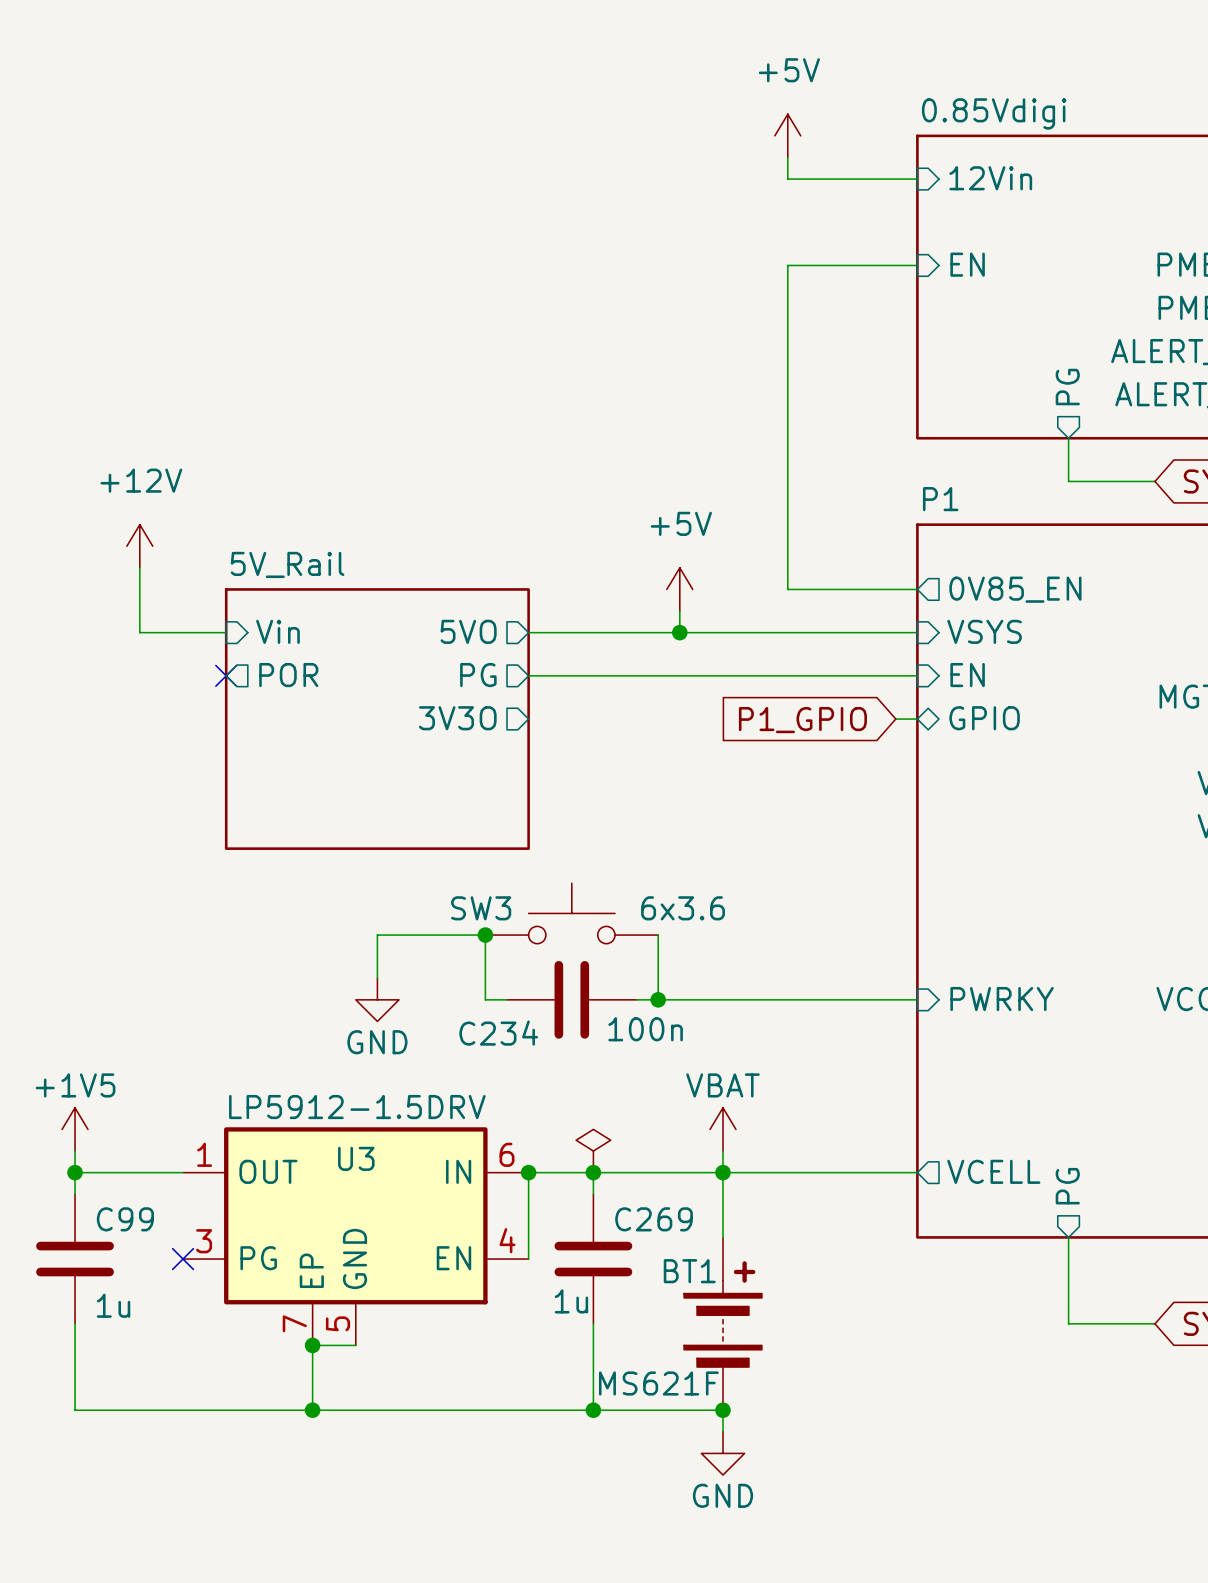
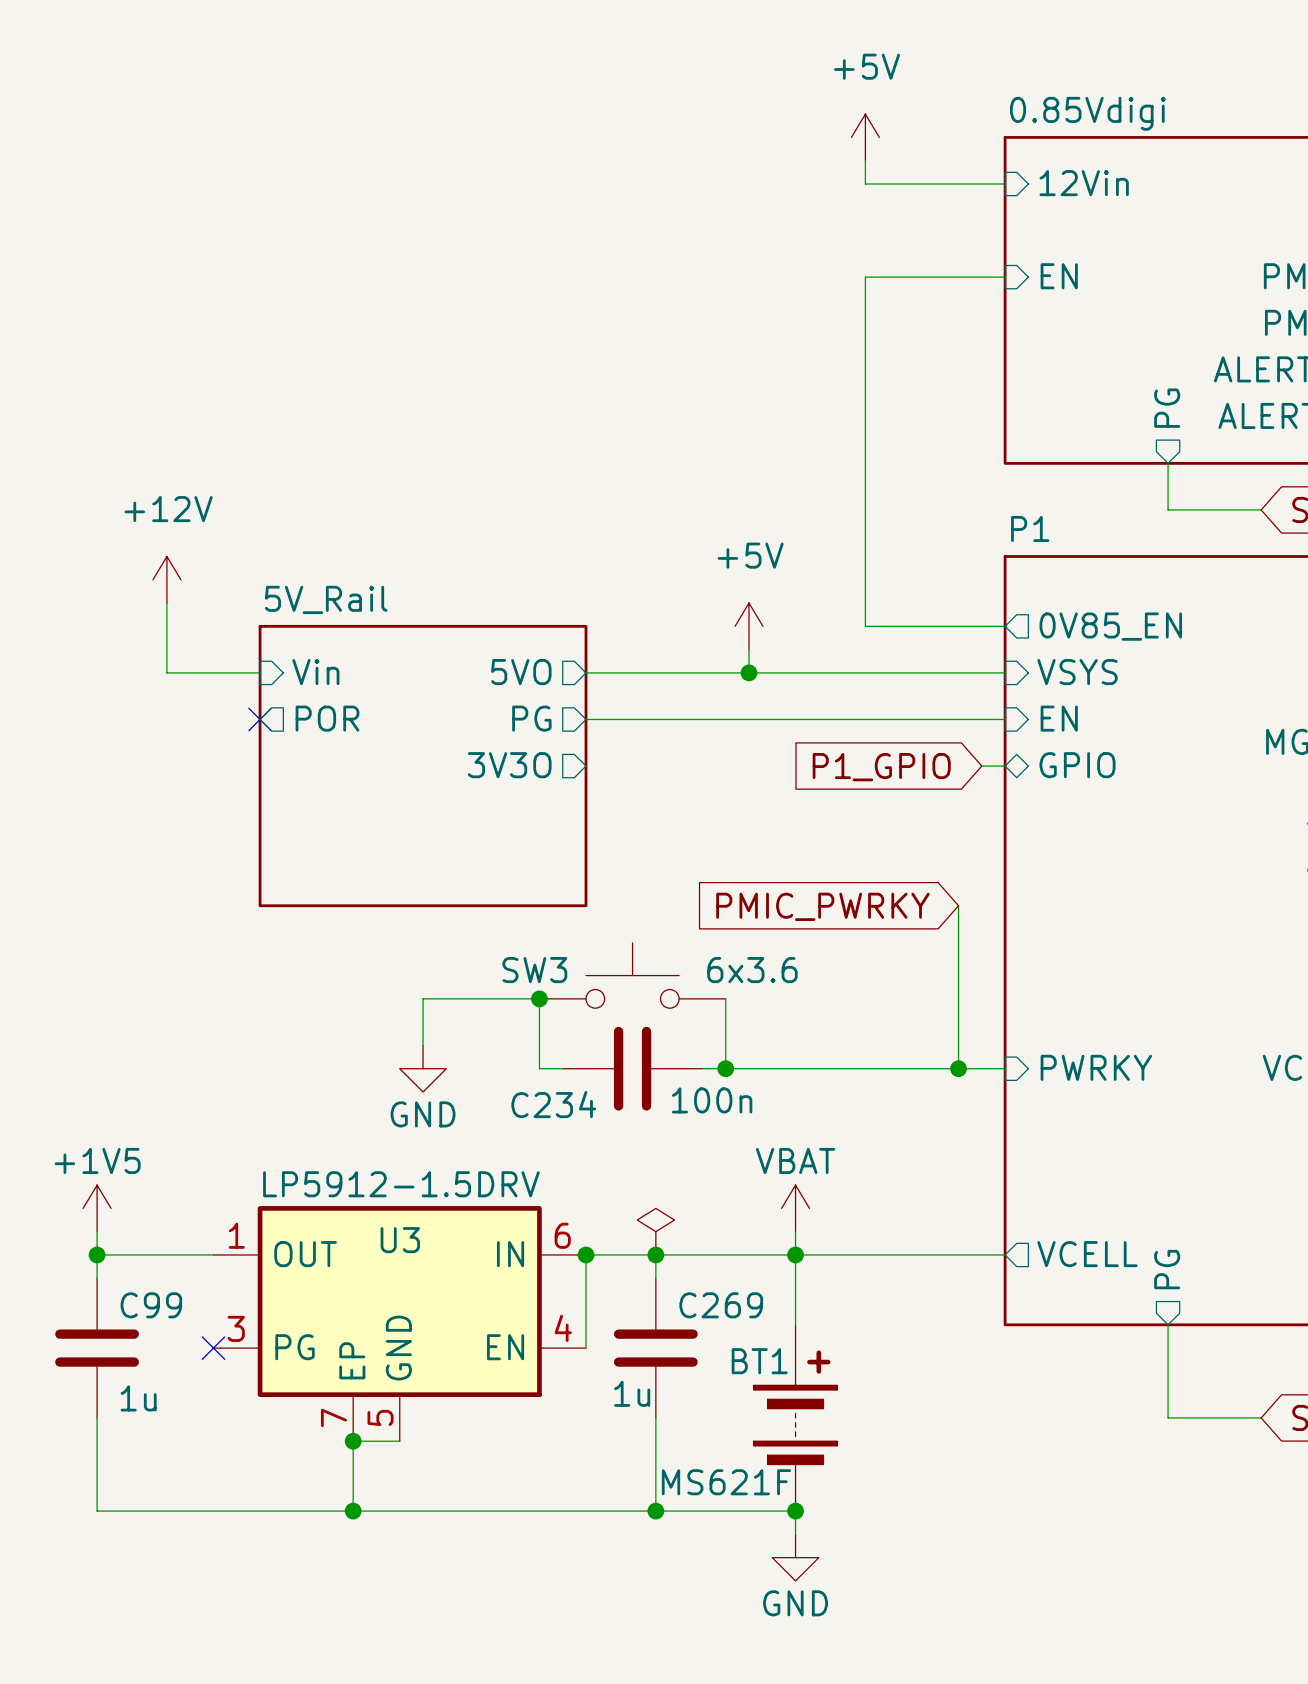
wire: none -> (958, 905) (958, 1068)
global label: none -> PMIC_PWRKY (822, 906)
junction: none -> (958, 1068)

